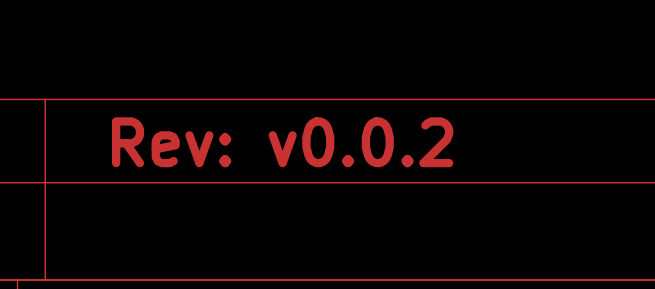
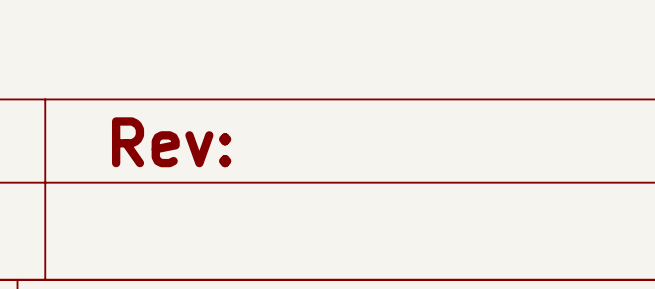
title block: Rev: v0.0.2 (282, 142) -> Rev: (171, 142)

